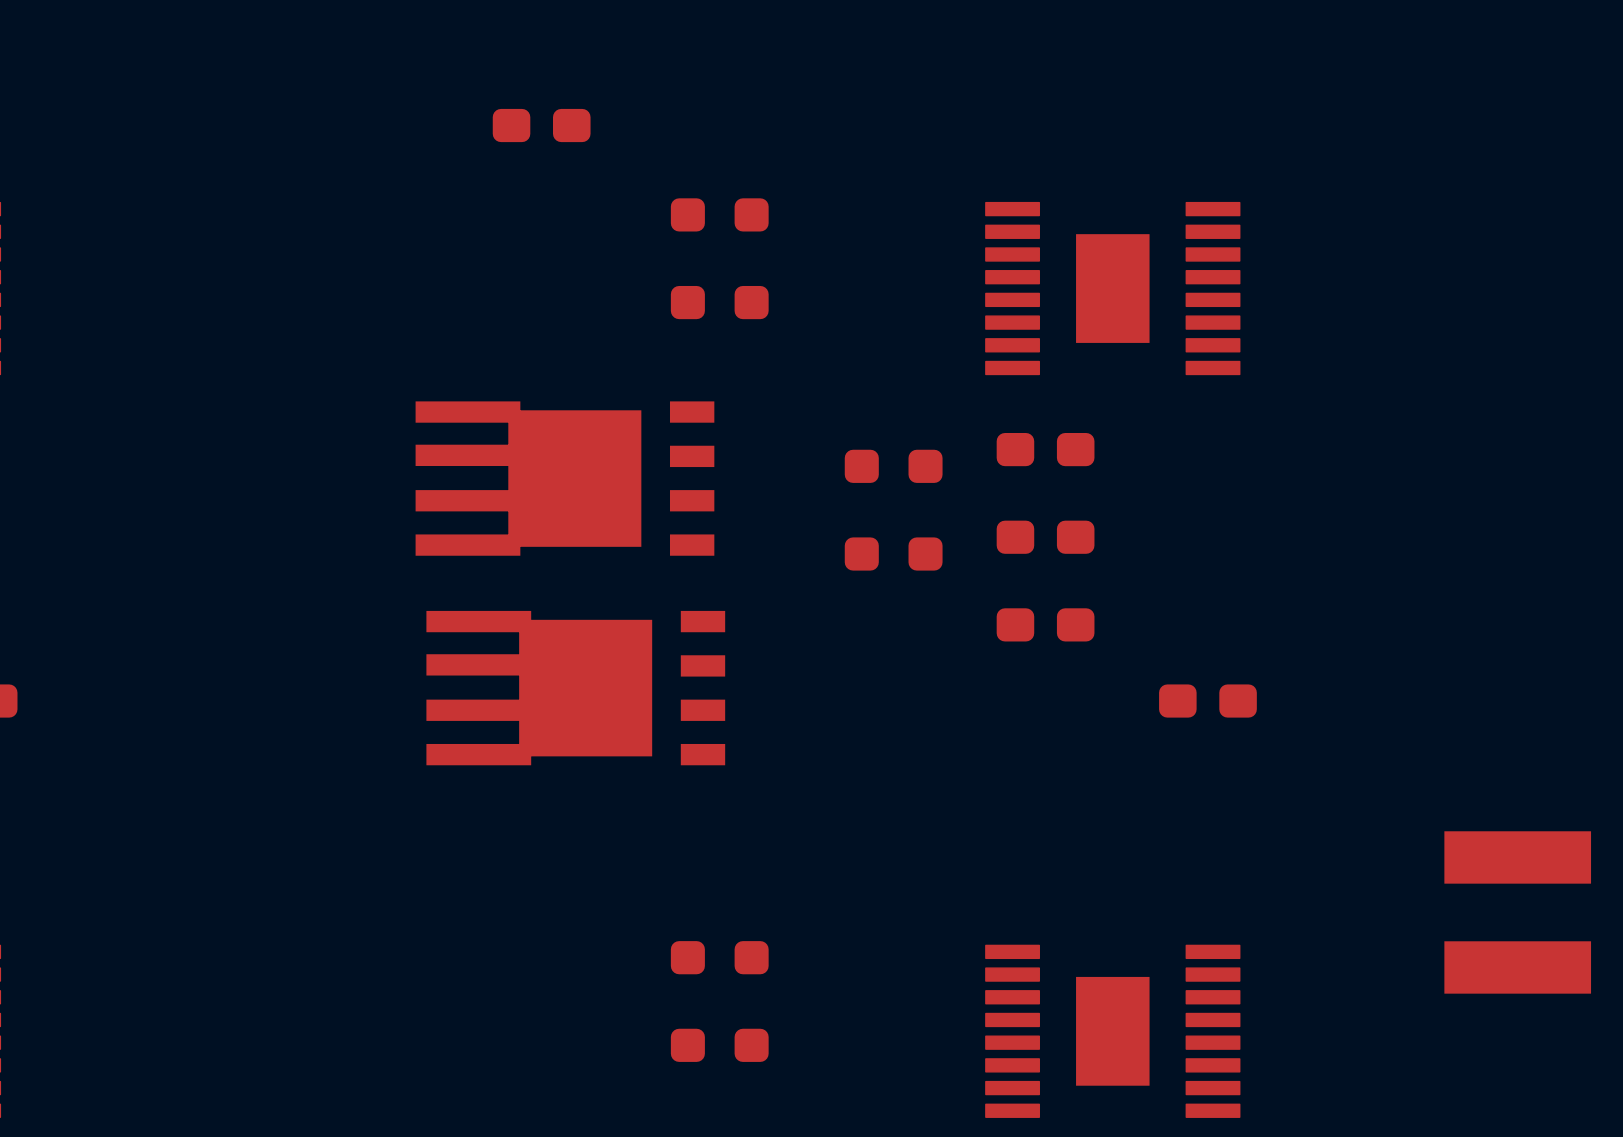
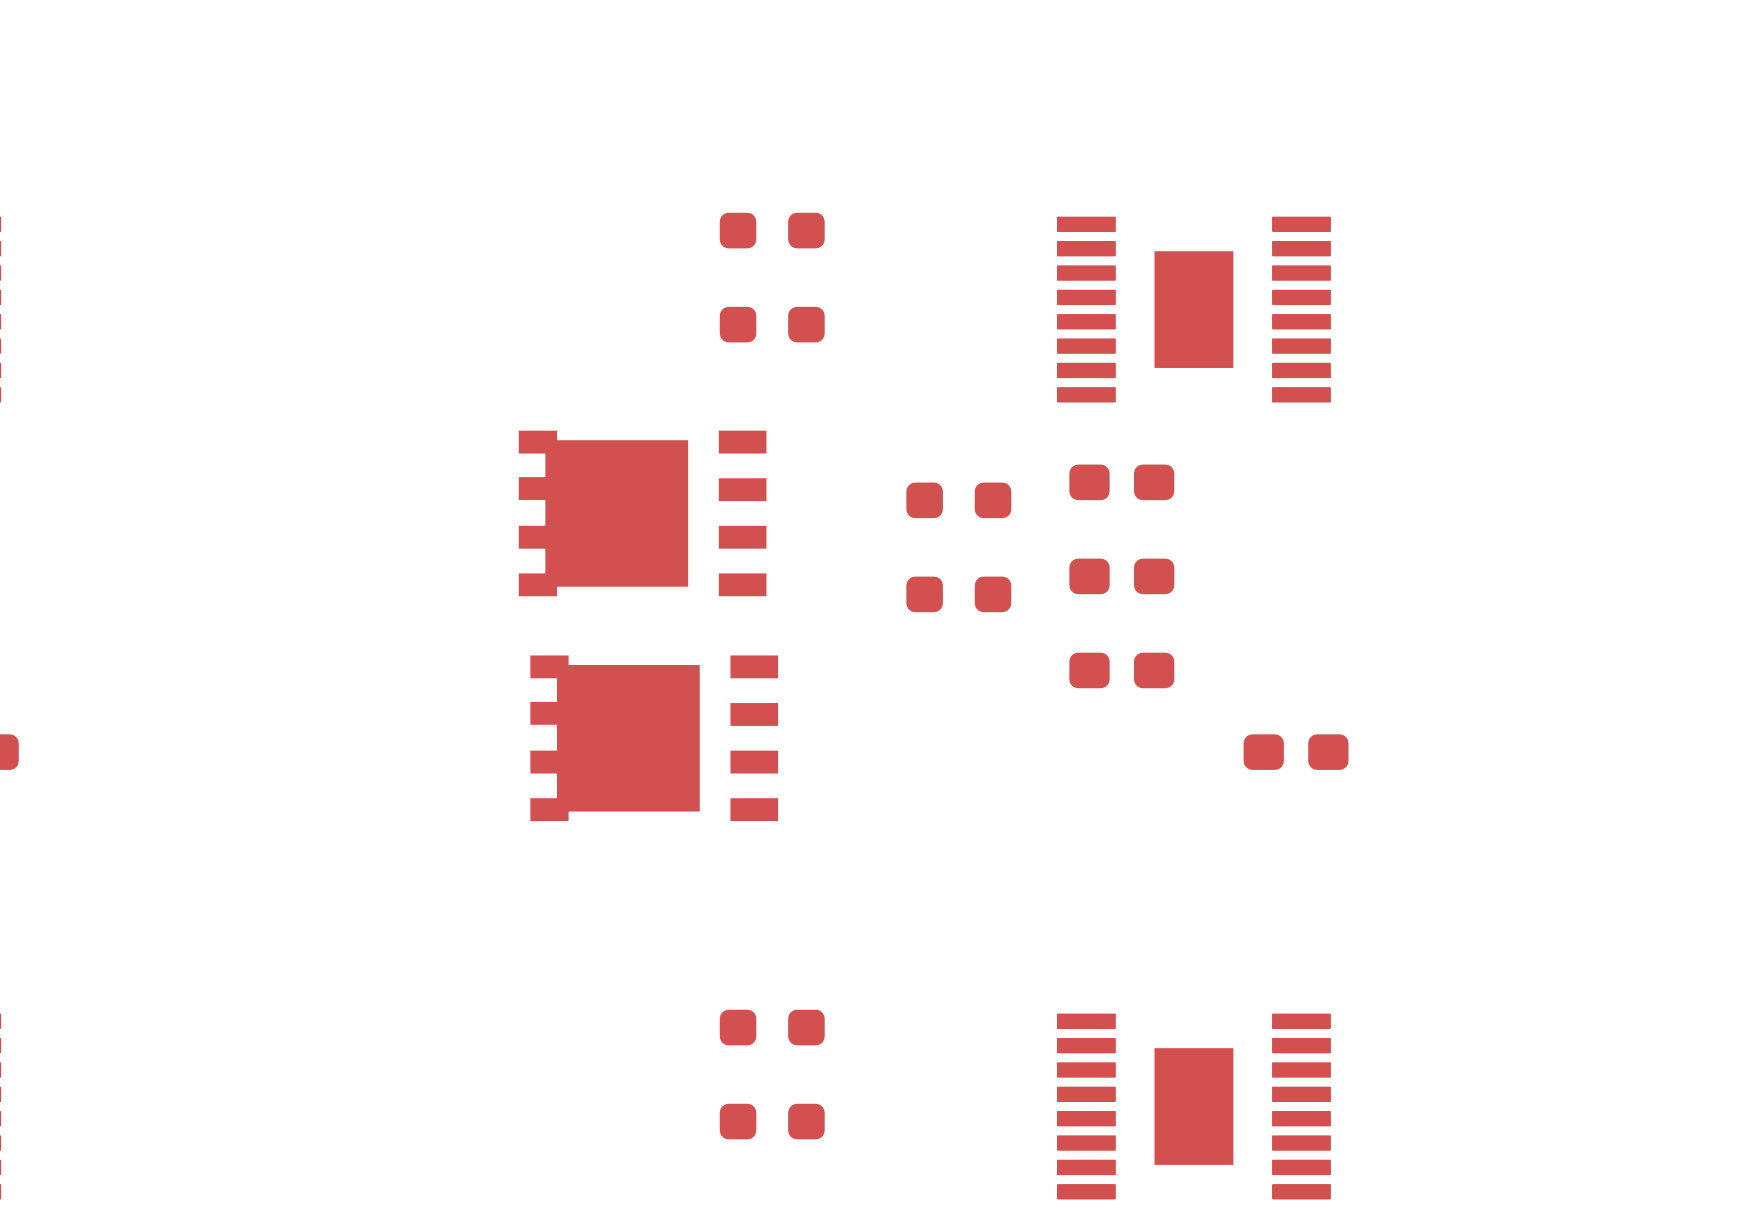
part: (541, 125) -> none
part footprint: [415, 401, 715, 556] -> [518, 430, 767, 597]
part footprint: [426, 610, 726, 766] -> [530, 655, 779, 822]
part: (1517, 857) -> none
part: (1517, 967) -> none

